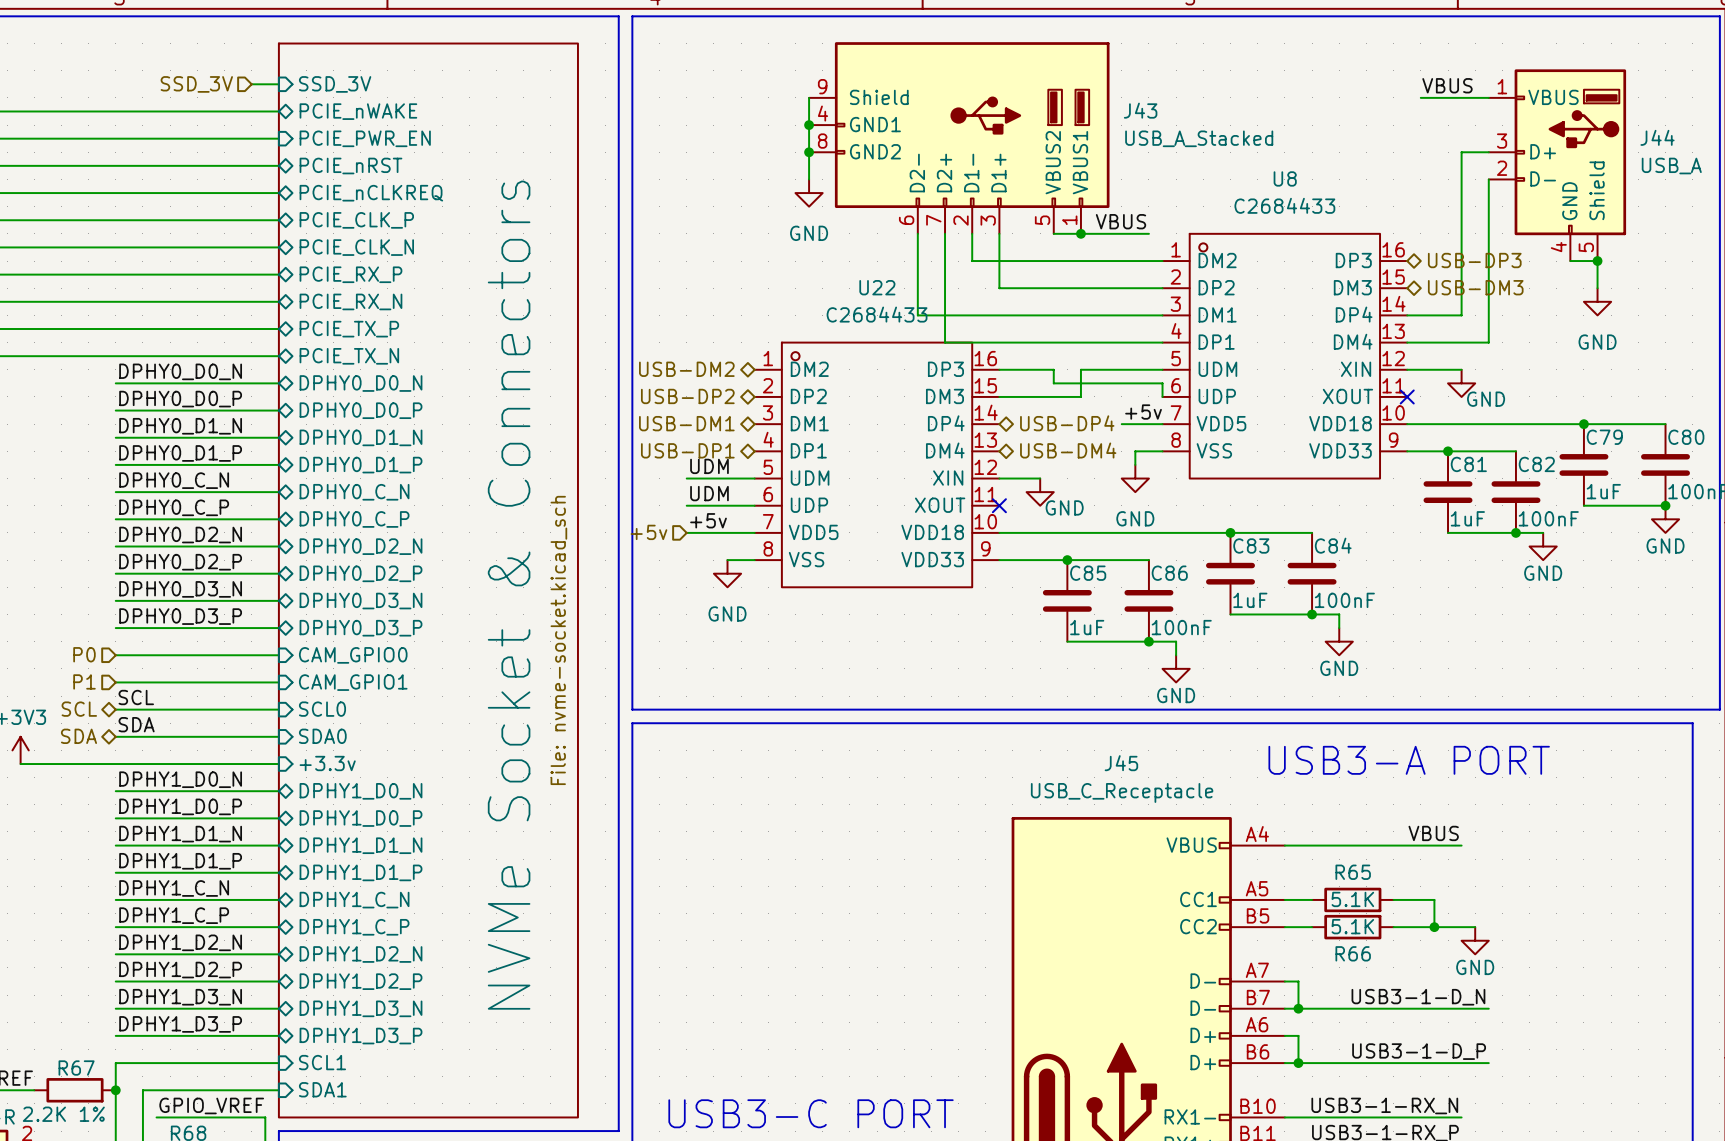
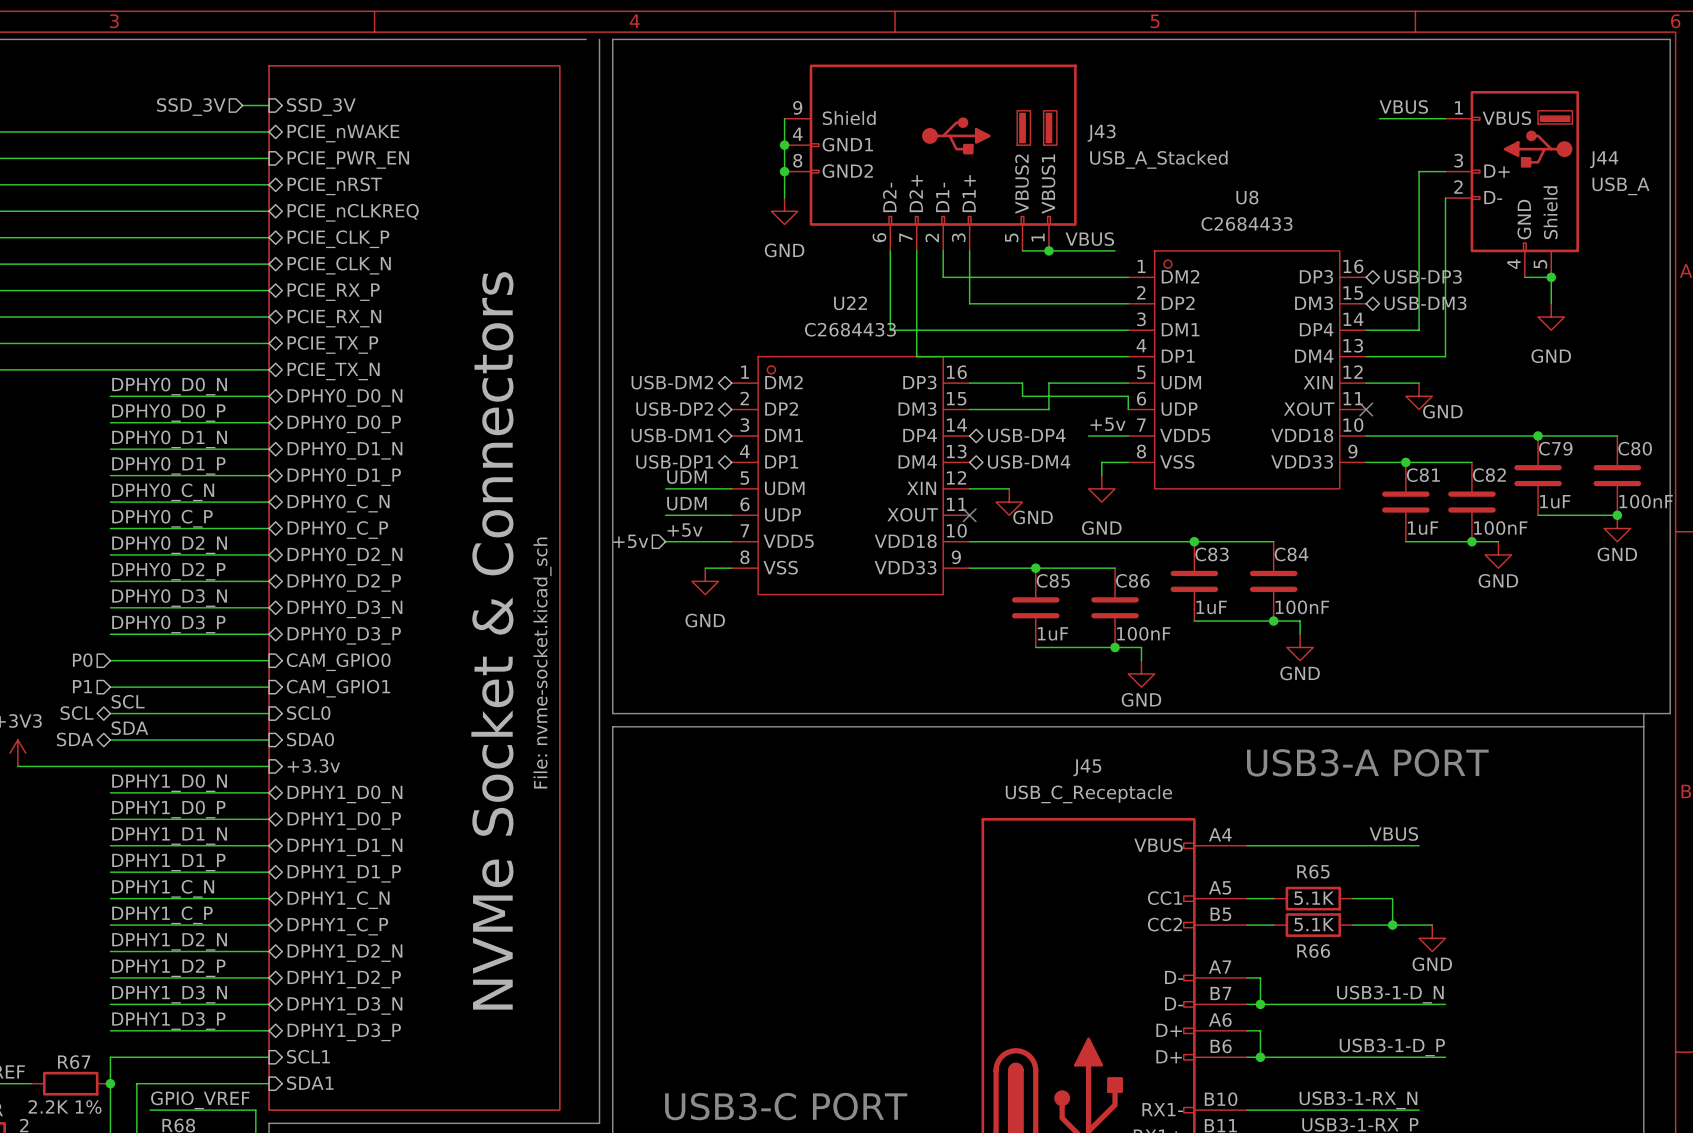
line: (605, 16) (618, 16) -> none
line: none -> (1643, 713) (1643, 726)

